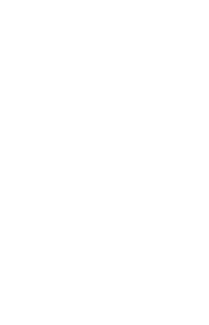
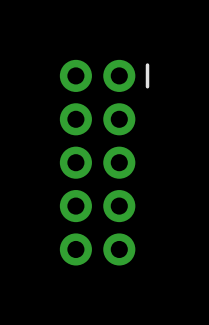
part: none -> (104, 162)

